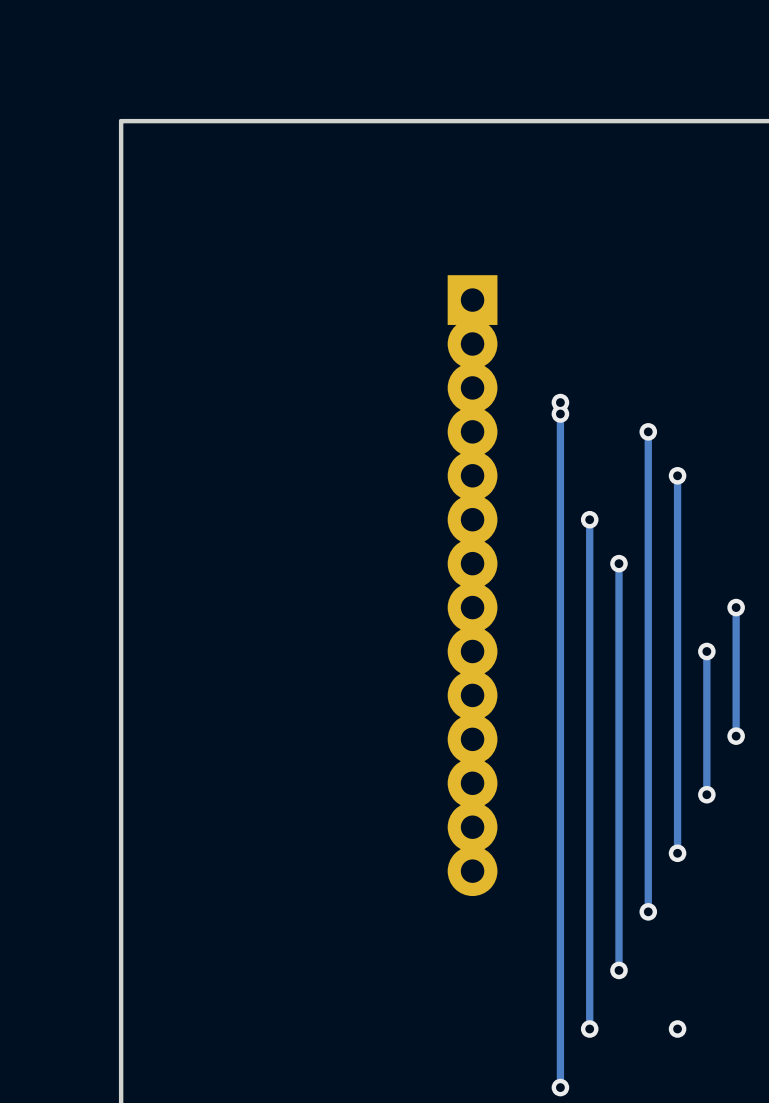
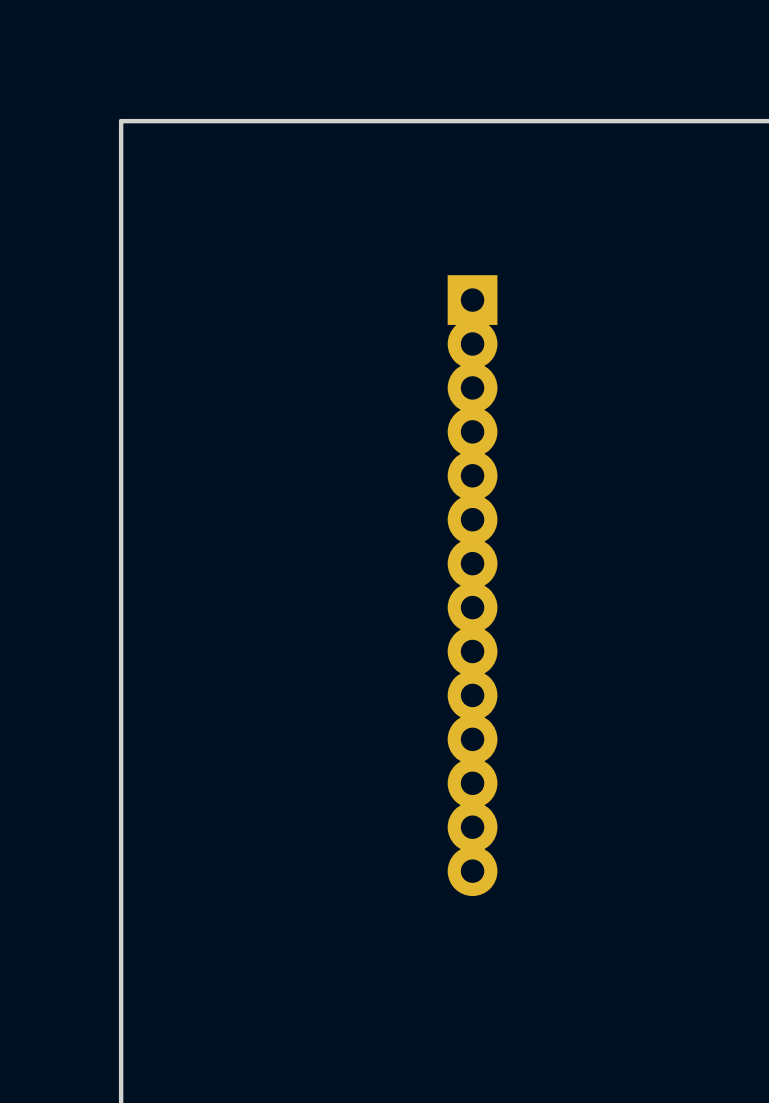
track: (560, 402) (560, 1087) -> none
via: (560, 402) -> none
via: (560, 413) -> none
track: (648, 431) (648, 911) -> none
via: (648, 431) -> none
track: (677, 475) (677, 853) -> none
via: (677, 475) -> none
track: (589, 519) (589, 1029) -> none
via: (589, 519) -> none
track: (618, 563) (618, 970) -> none
via: (618, 563) -> none
track: (736, 607) (736, 736) -> none
via: (736, 607) -> none
track: (706, 651) (706, 794) -> none
via: (706, 651) -> none
via: (736, 736) -> none
via: (706, 794) -> none
via: (677, 853) -> none
via: (648, 911) -> none
via: (618, 970) -> none
via: (589, 1029) -> none
via: (677, 1029) -> none
via: (560, 1087) -> none

